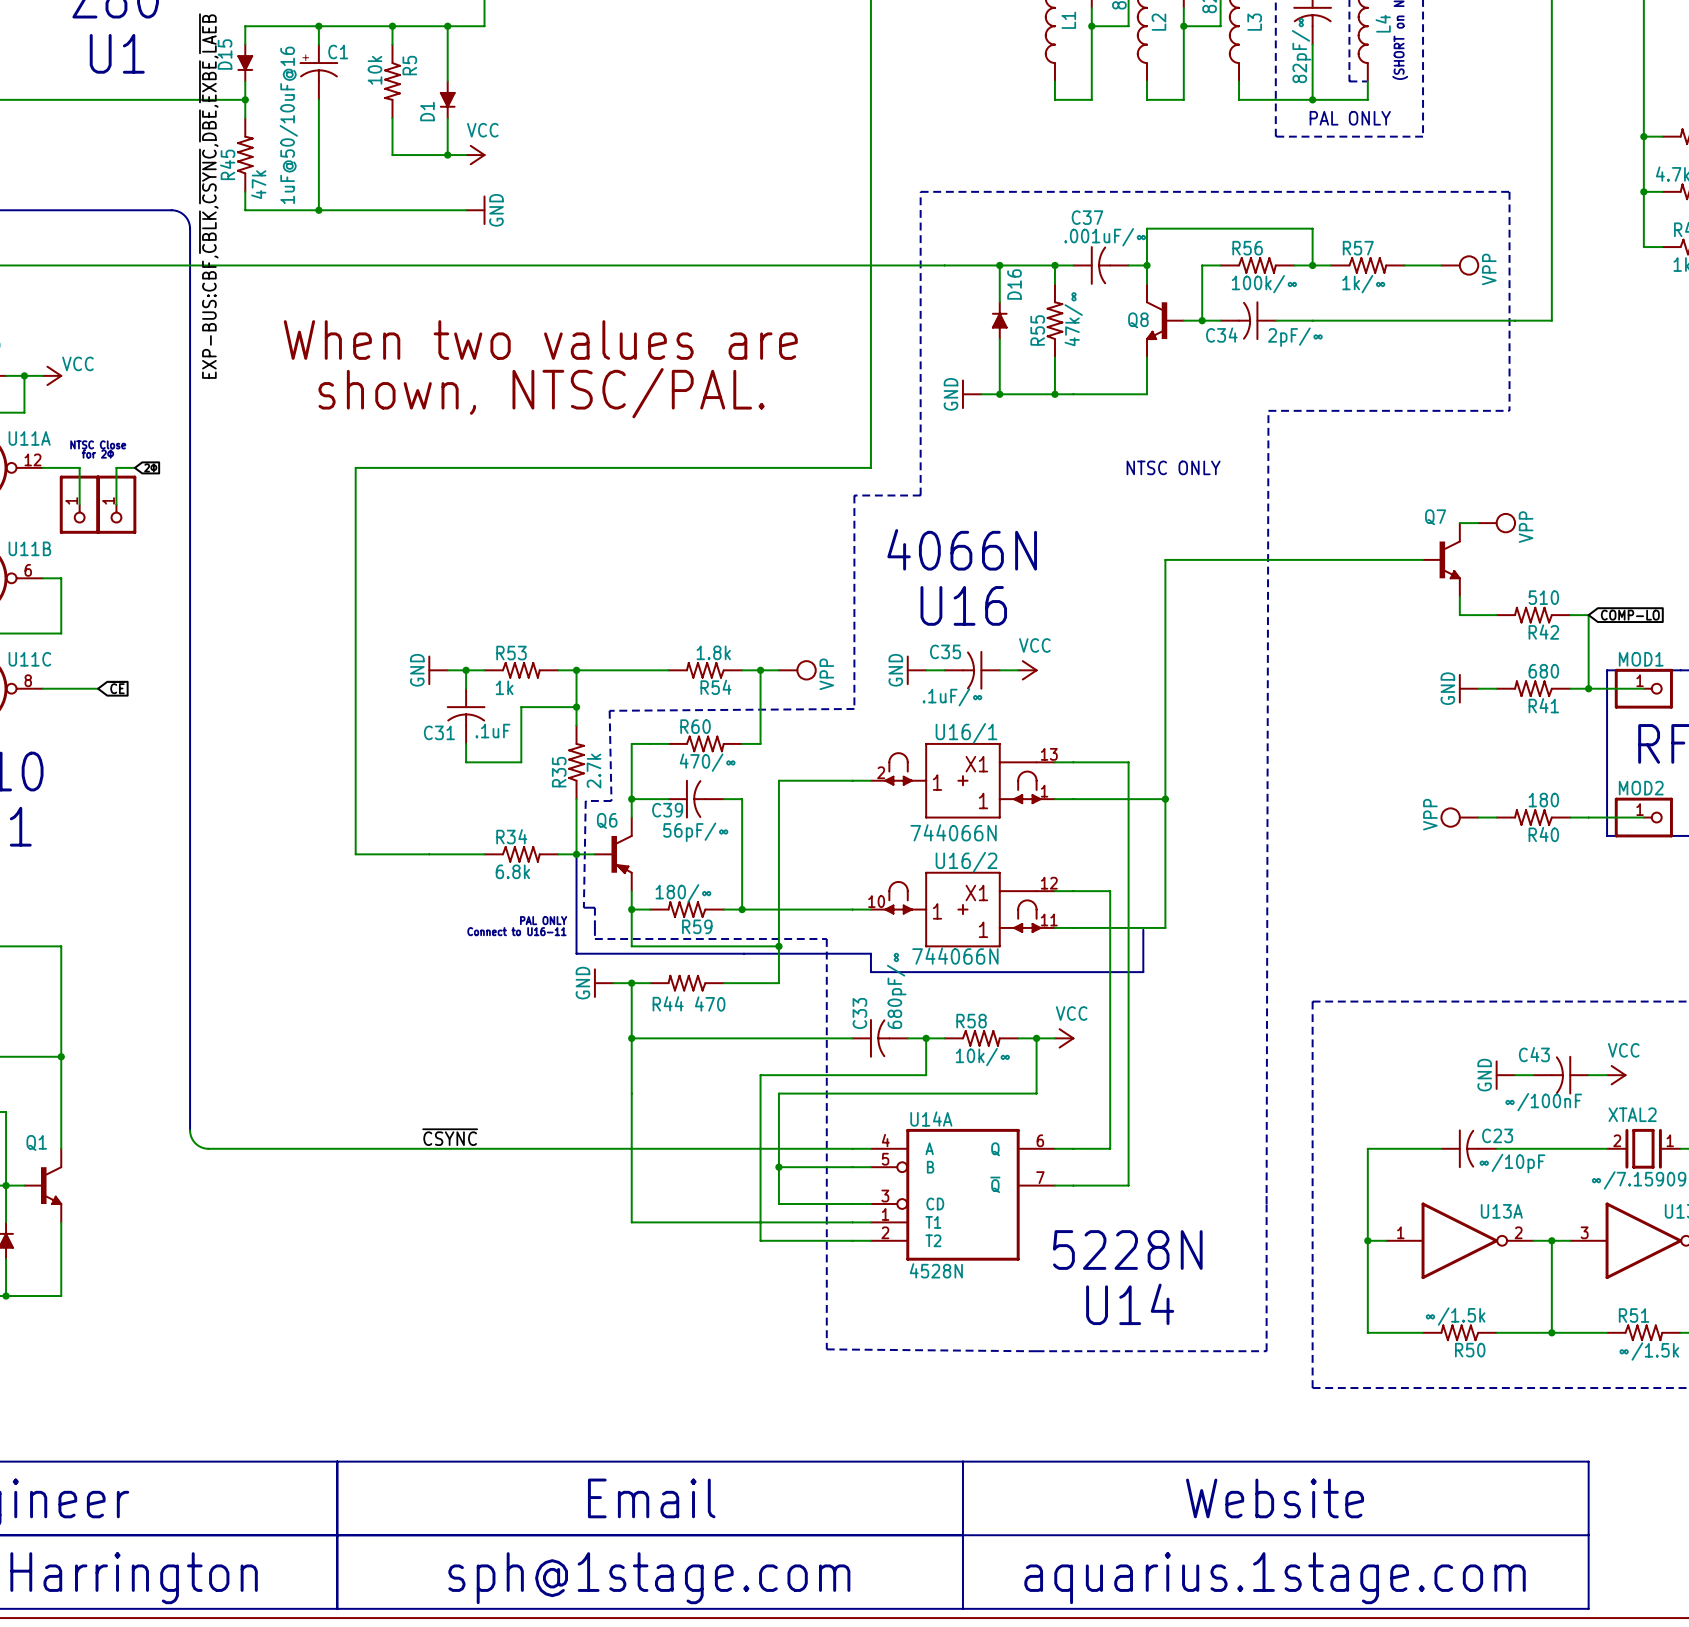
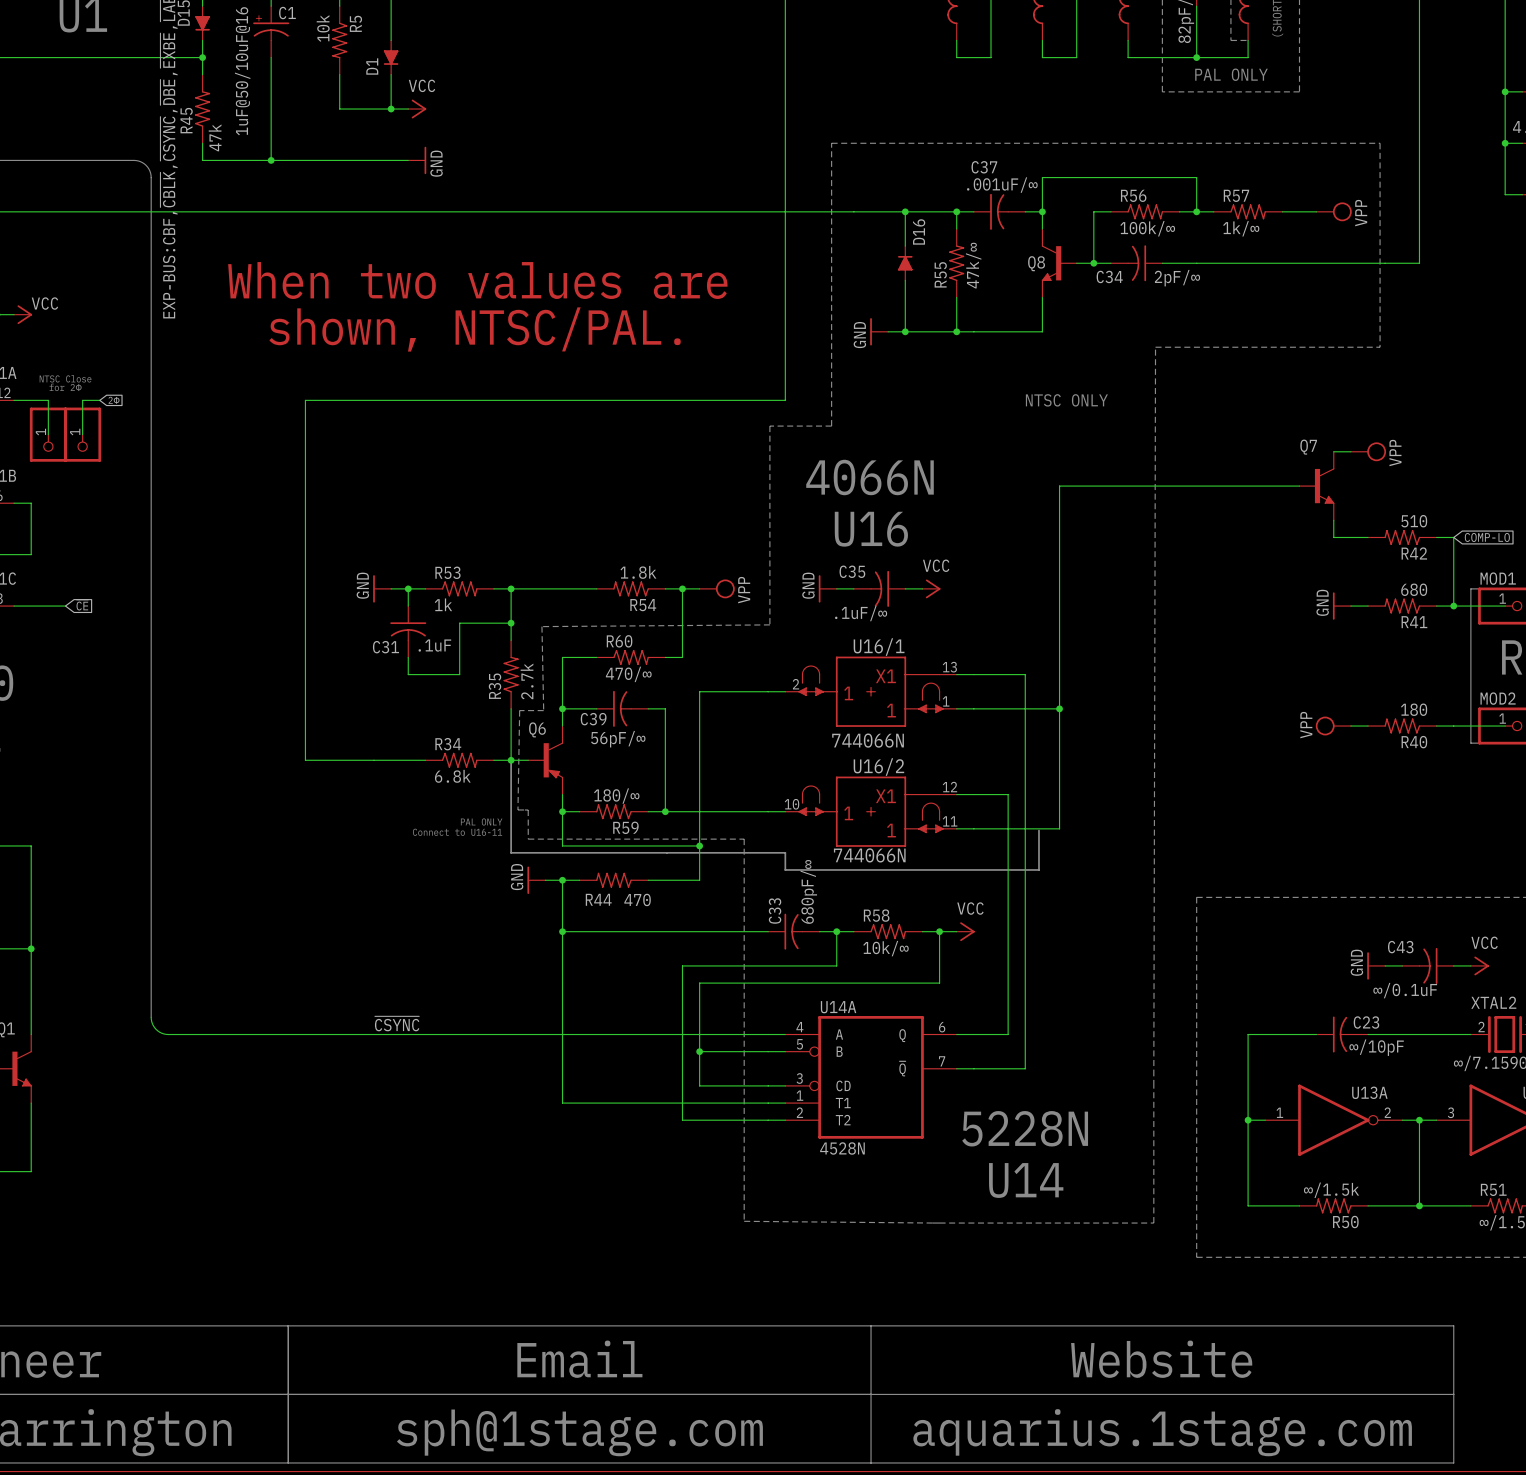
C43 value: ∞/100nF (1543, 1102) -> ∞/0.1uF (1405, 990)

